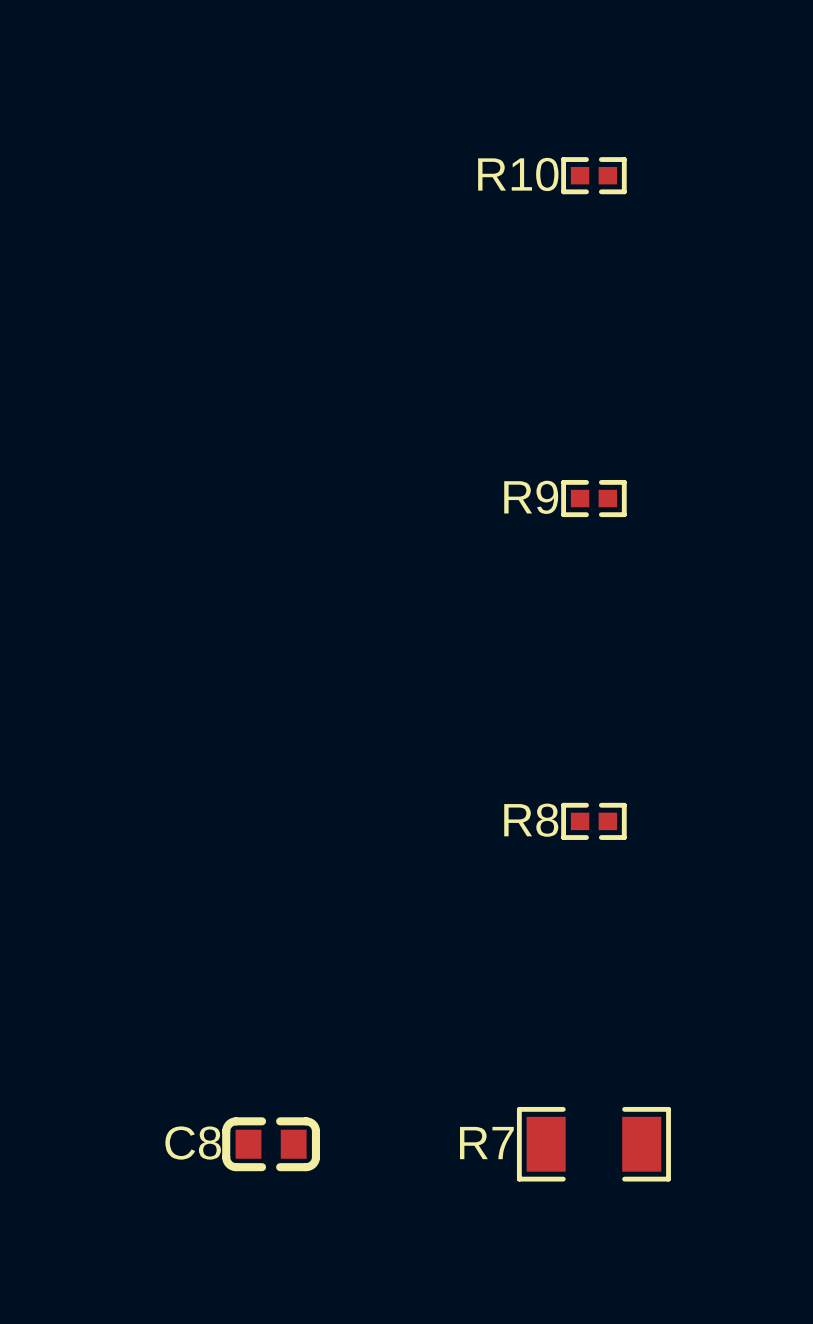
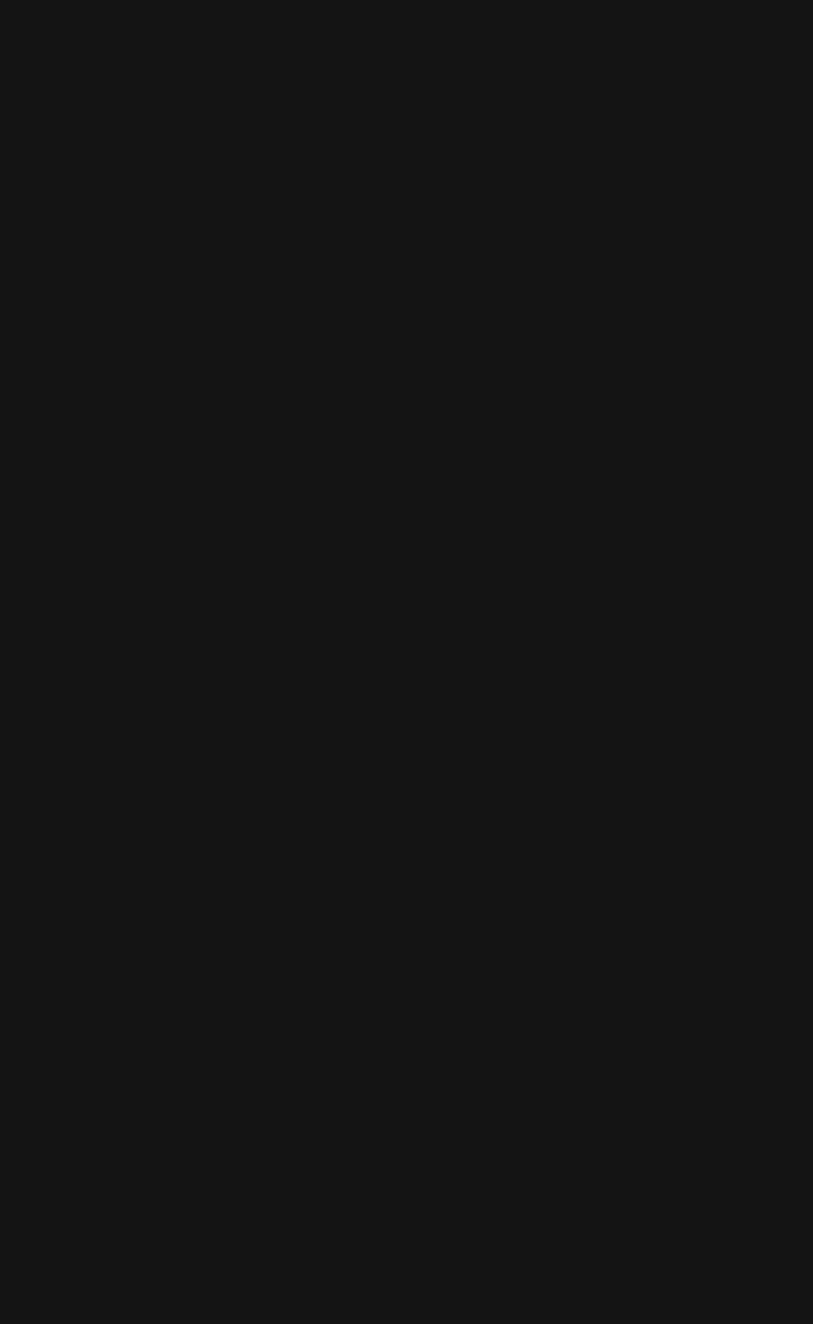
R10: (593, 175) -> none
R9: (593, 498) -> none
R8: (593, 821) -> none
C8: (271, 1144) -> none
R7: (593, 1144) -> none

